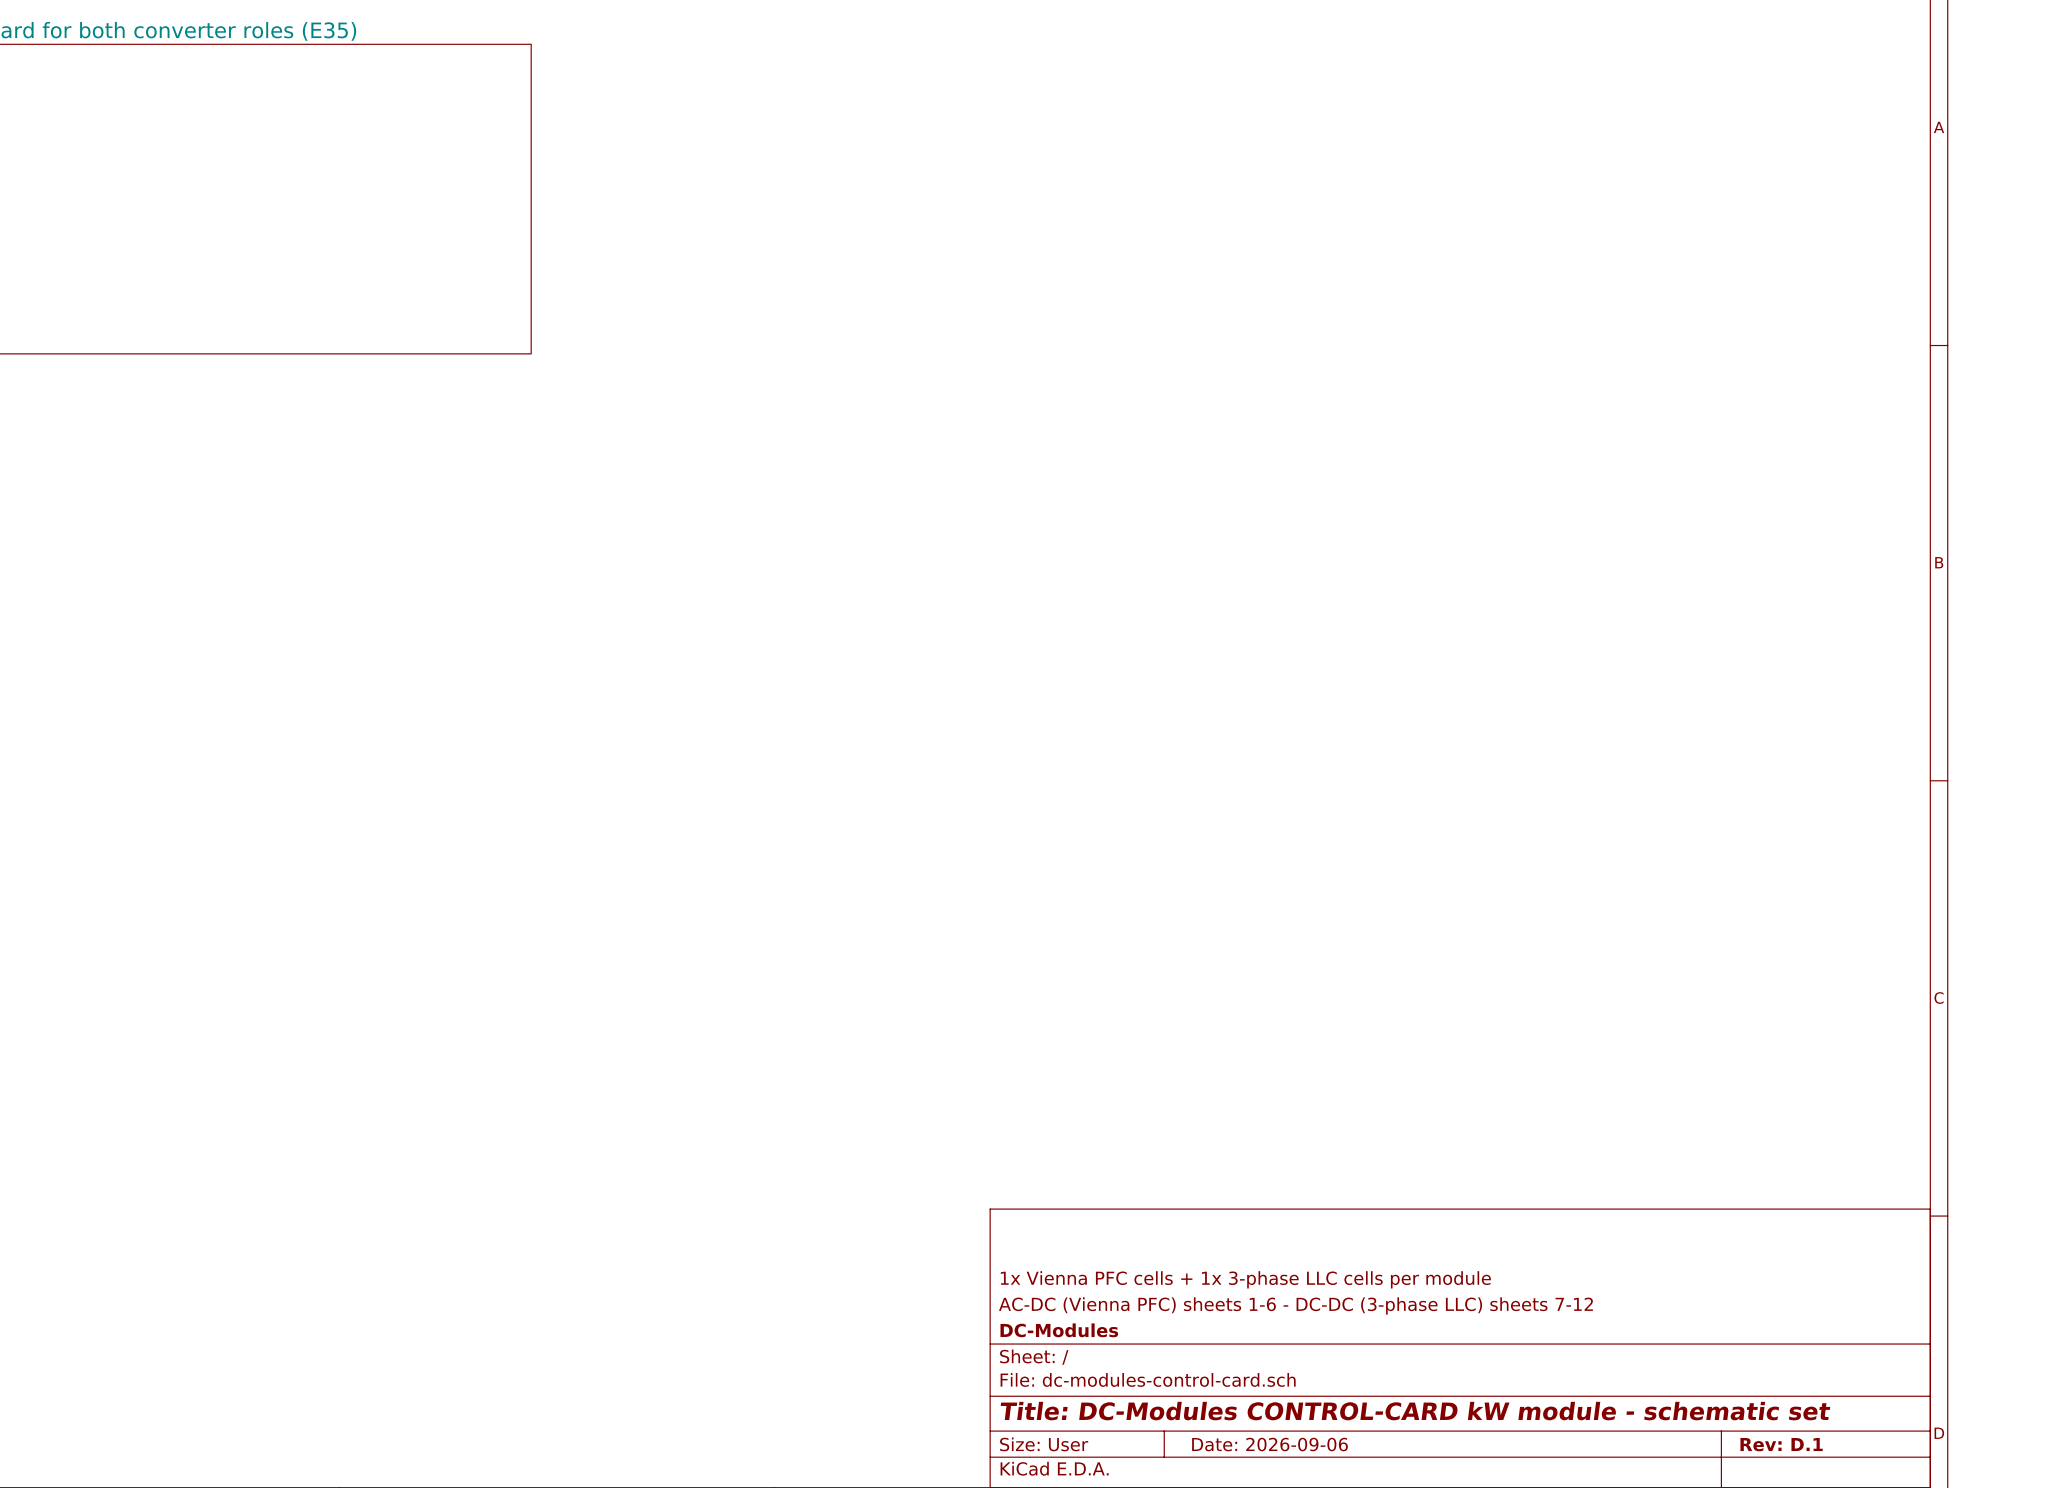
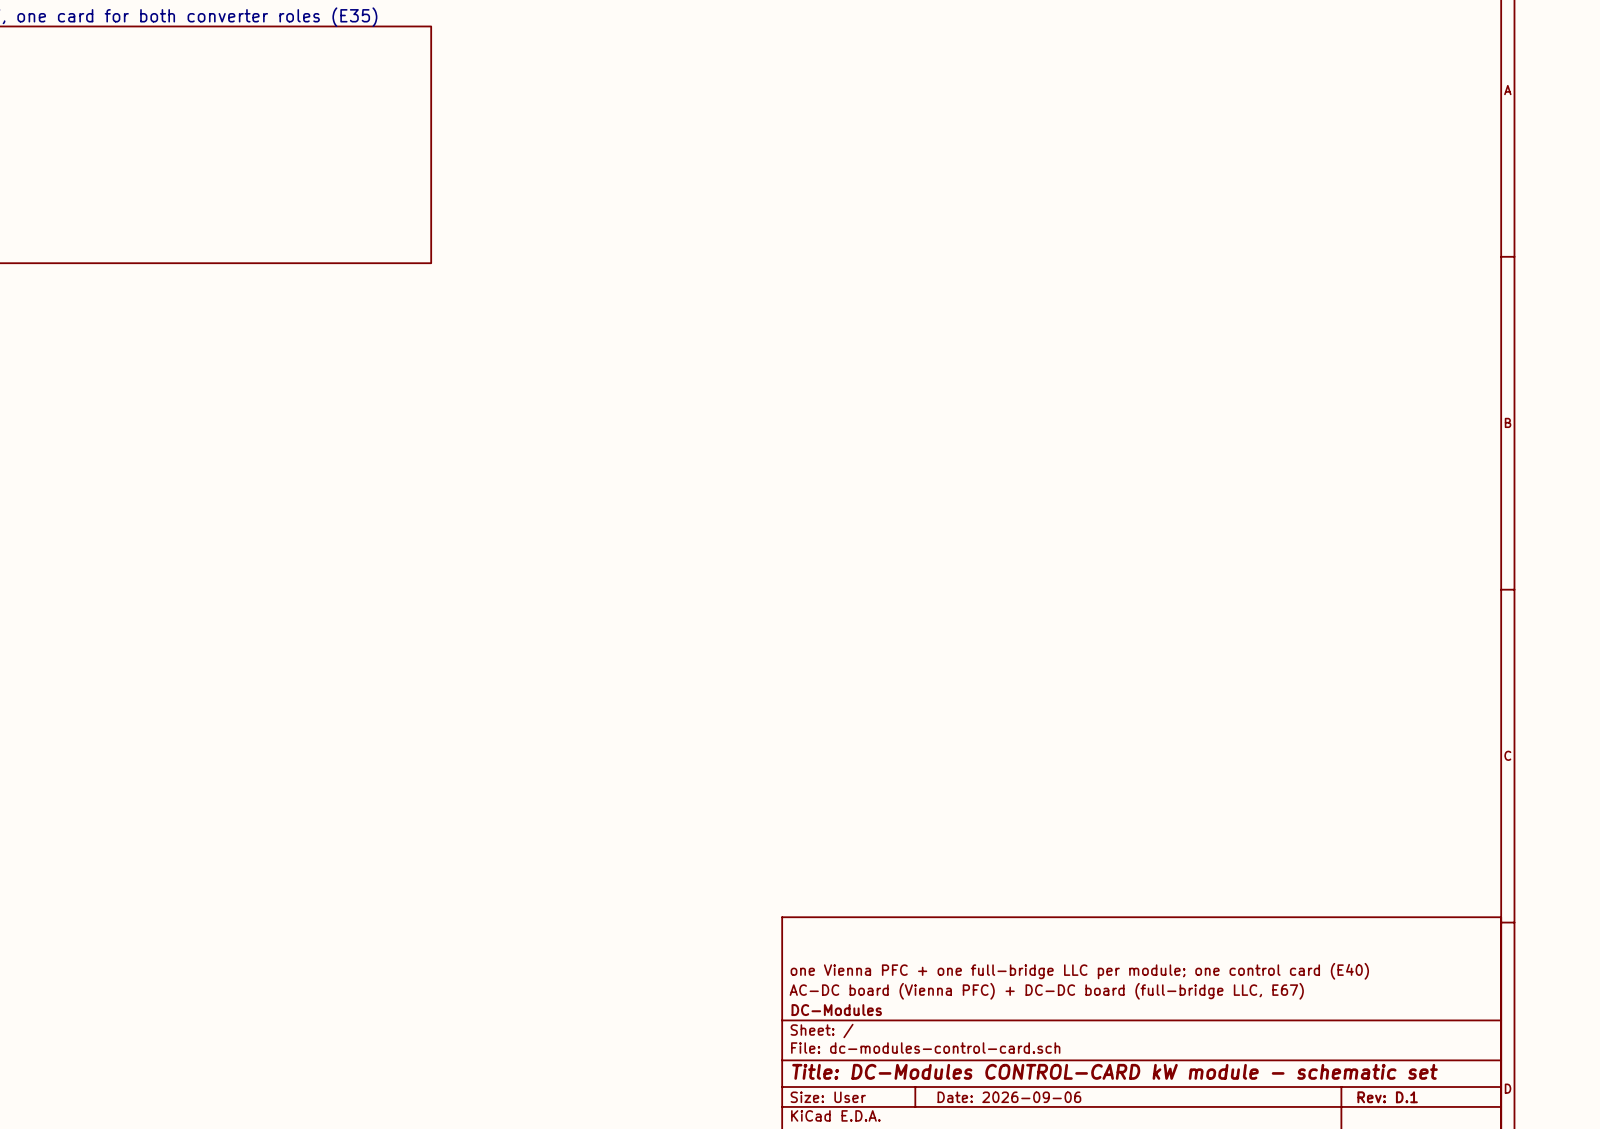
title block: 1x Vienna PFC cells + 1x 3-phase LLC cells per module (1245, 1279) -> one Vienna PFC + one full-bridge LLC per module; one control card (E40) (1079, 971)
title block: AC-DC (Vienna PFC) sheets 1-6 - DC-DC (3-phase LLC) sheets 7-12 (1295, 1305) -> AC-DC board (Vienna PFC) + DC-DC board (full-bridge LLC, E67) (1046, 991)

